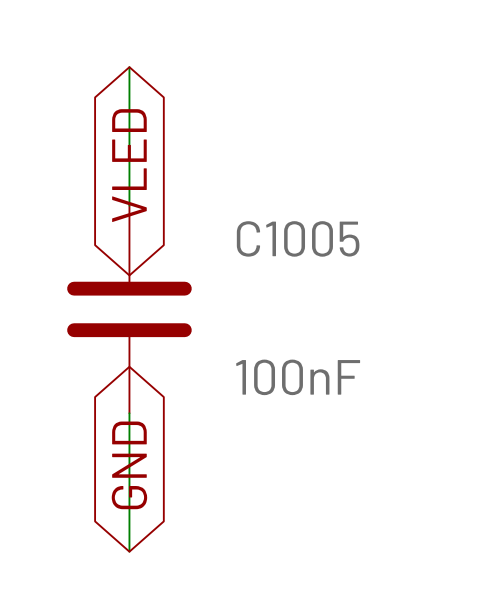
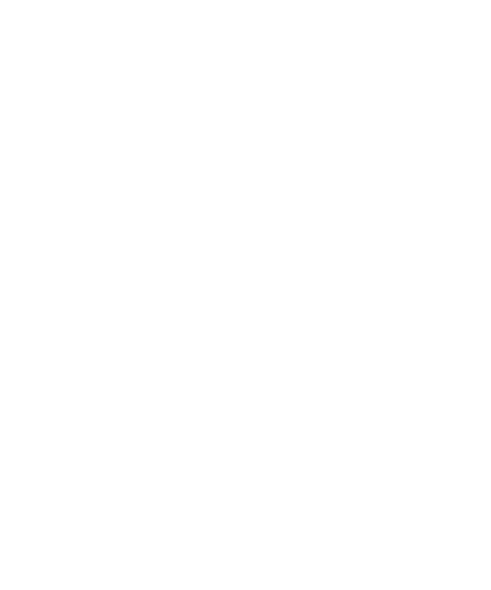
wire: (129, 67) (129, 205) -> none
global label: VLED (129, 165) -> none
C1005: 100nF (129, 309) -> none
wire: (129, 413) (129, 551) -> none
global label: GND (129, 465) -> none

